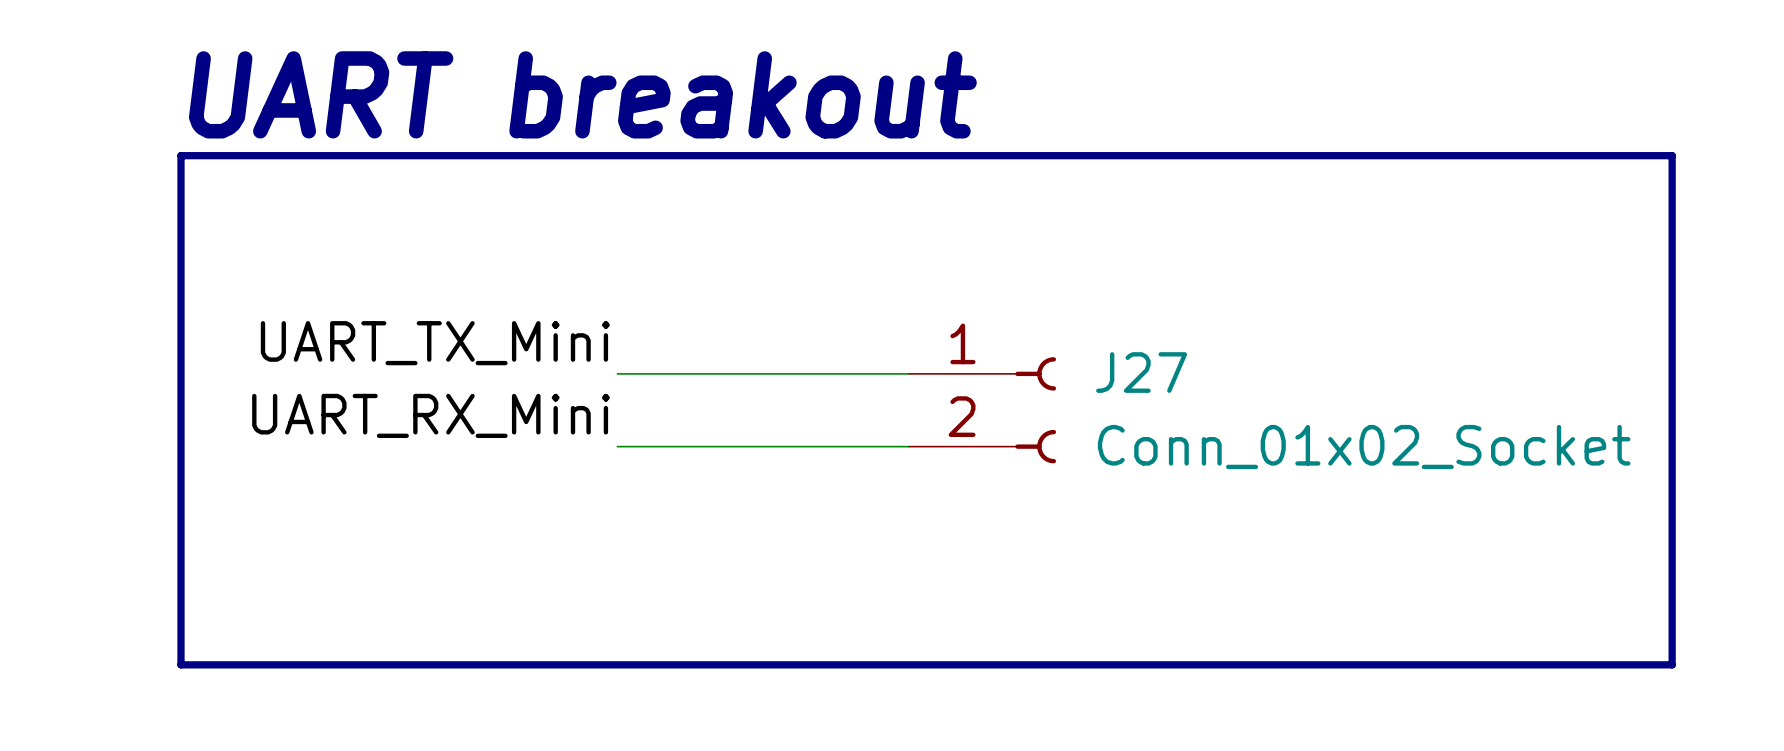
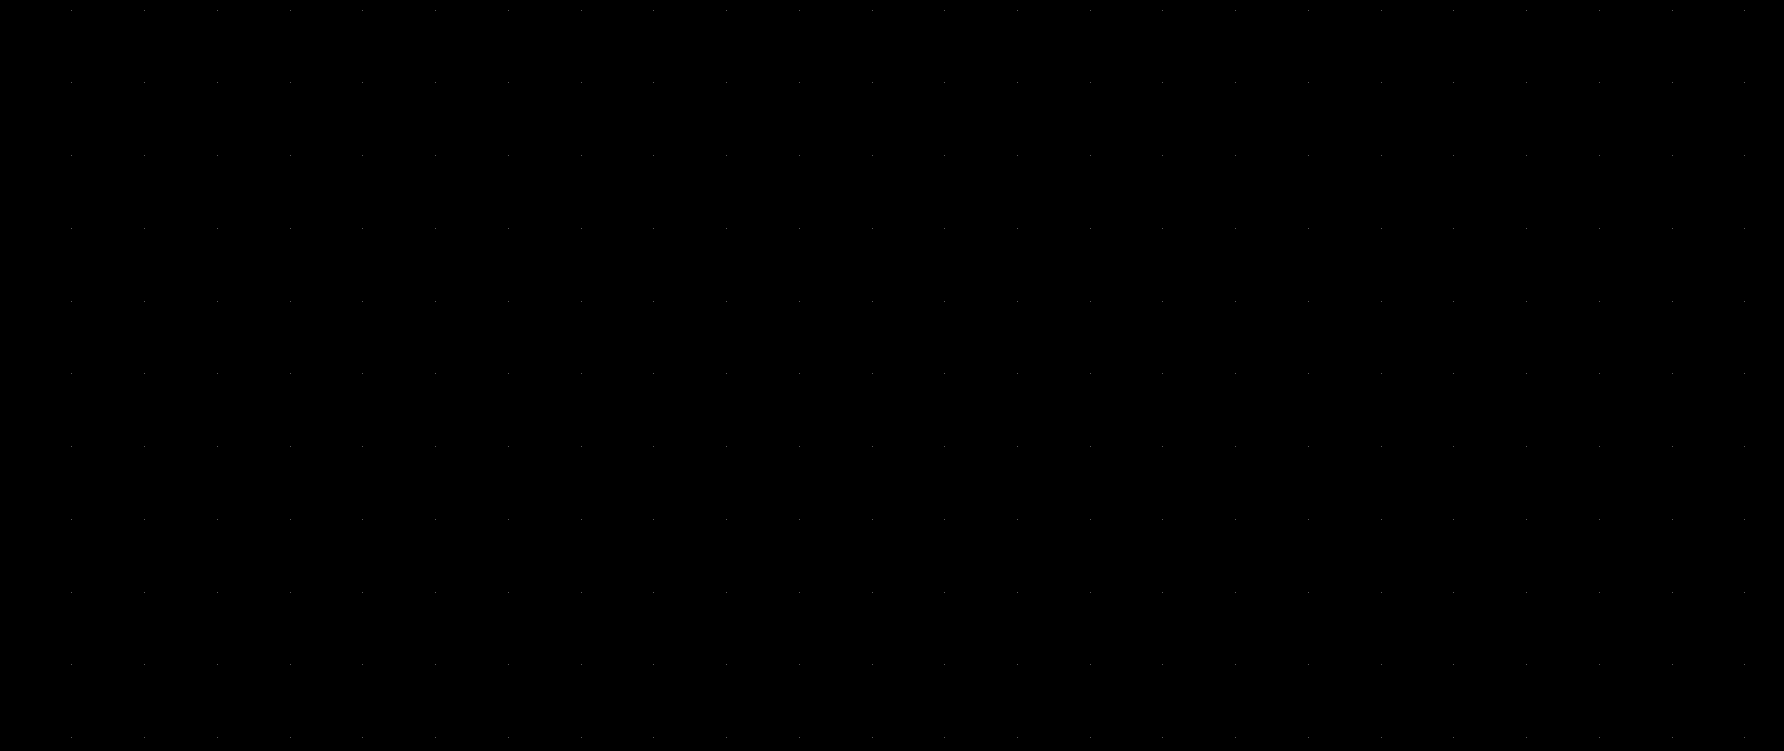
text: UART breakout (582, 94) -> none
line: (180, 155) (1672, 155) (1672, 664) (180, 664) (180, 155) -> none
label: UART_TX_Mini (435, 343) -> none
wire: (617, 373) (908, 373) -> none
J27: Conn_01x02_Socket (982, 410) -> none
label: UART_RX_Mini (430, 415) -> none
wire: (617, 446) (908, 446) -> none

